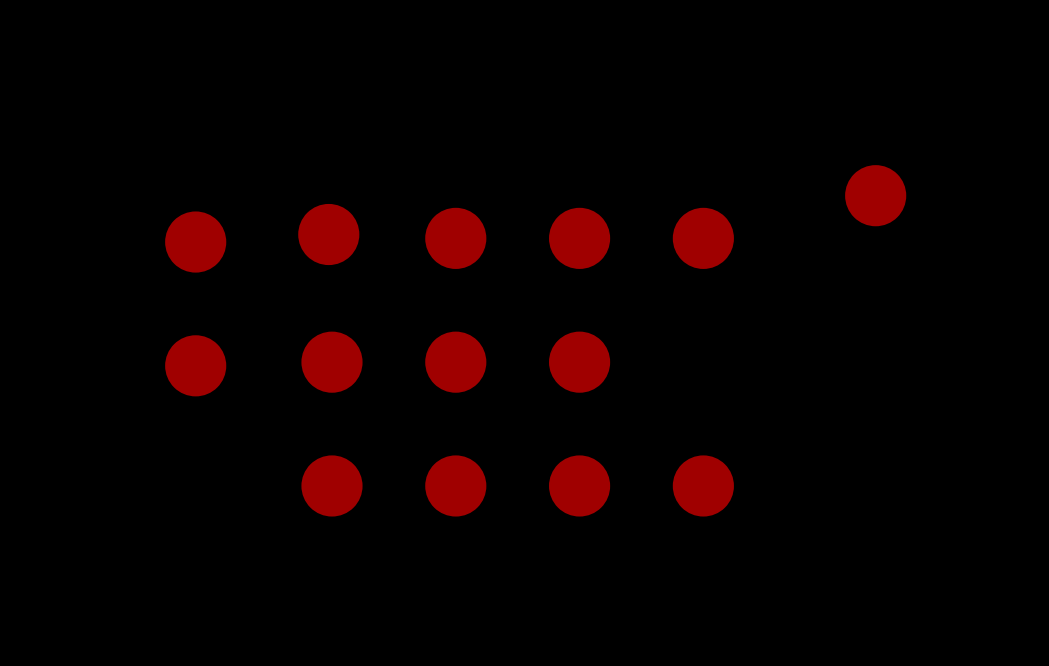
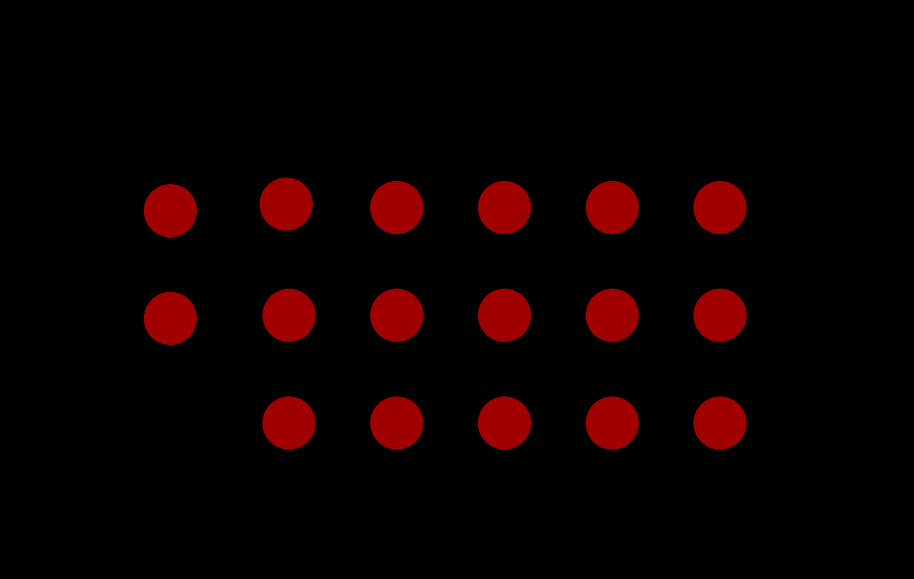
part position: (875, 195) -> (719, 207)
part: none -> (612, 315)
part: none -> (719, 315)
part: none -> (719, 423)

